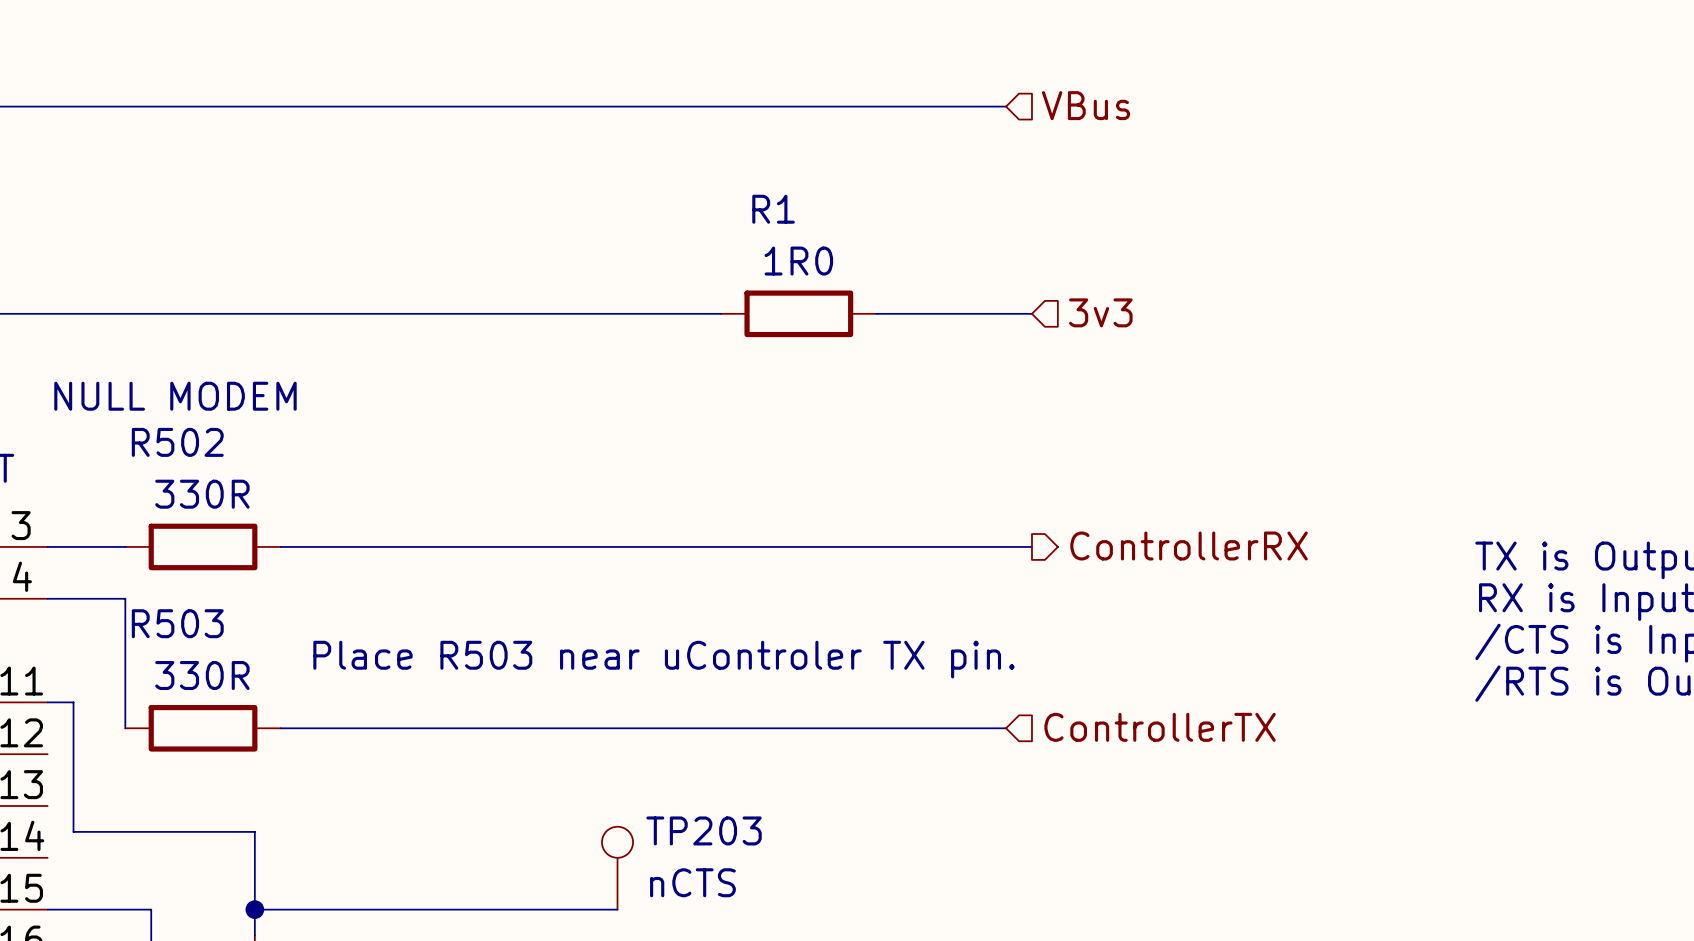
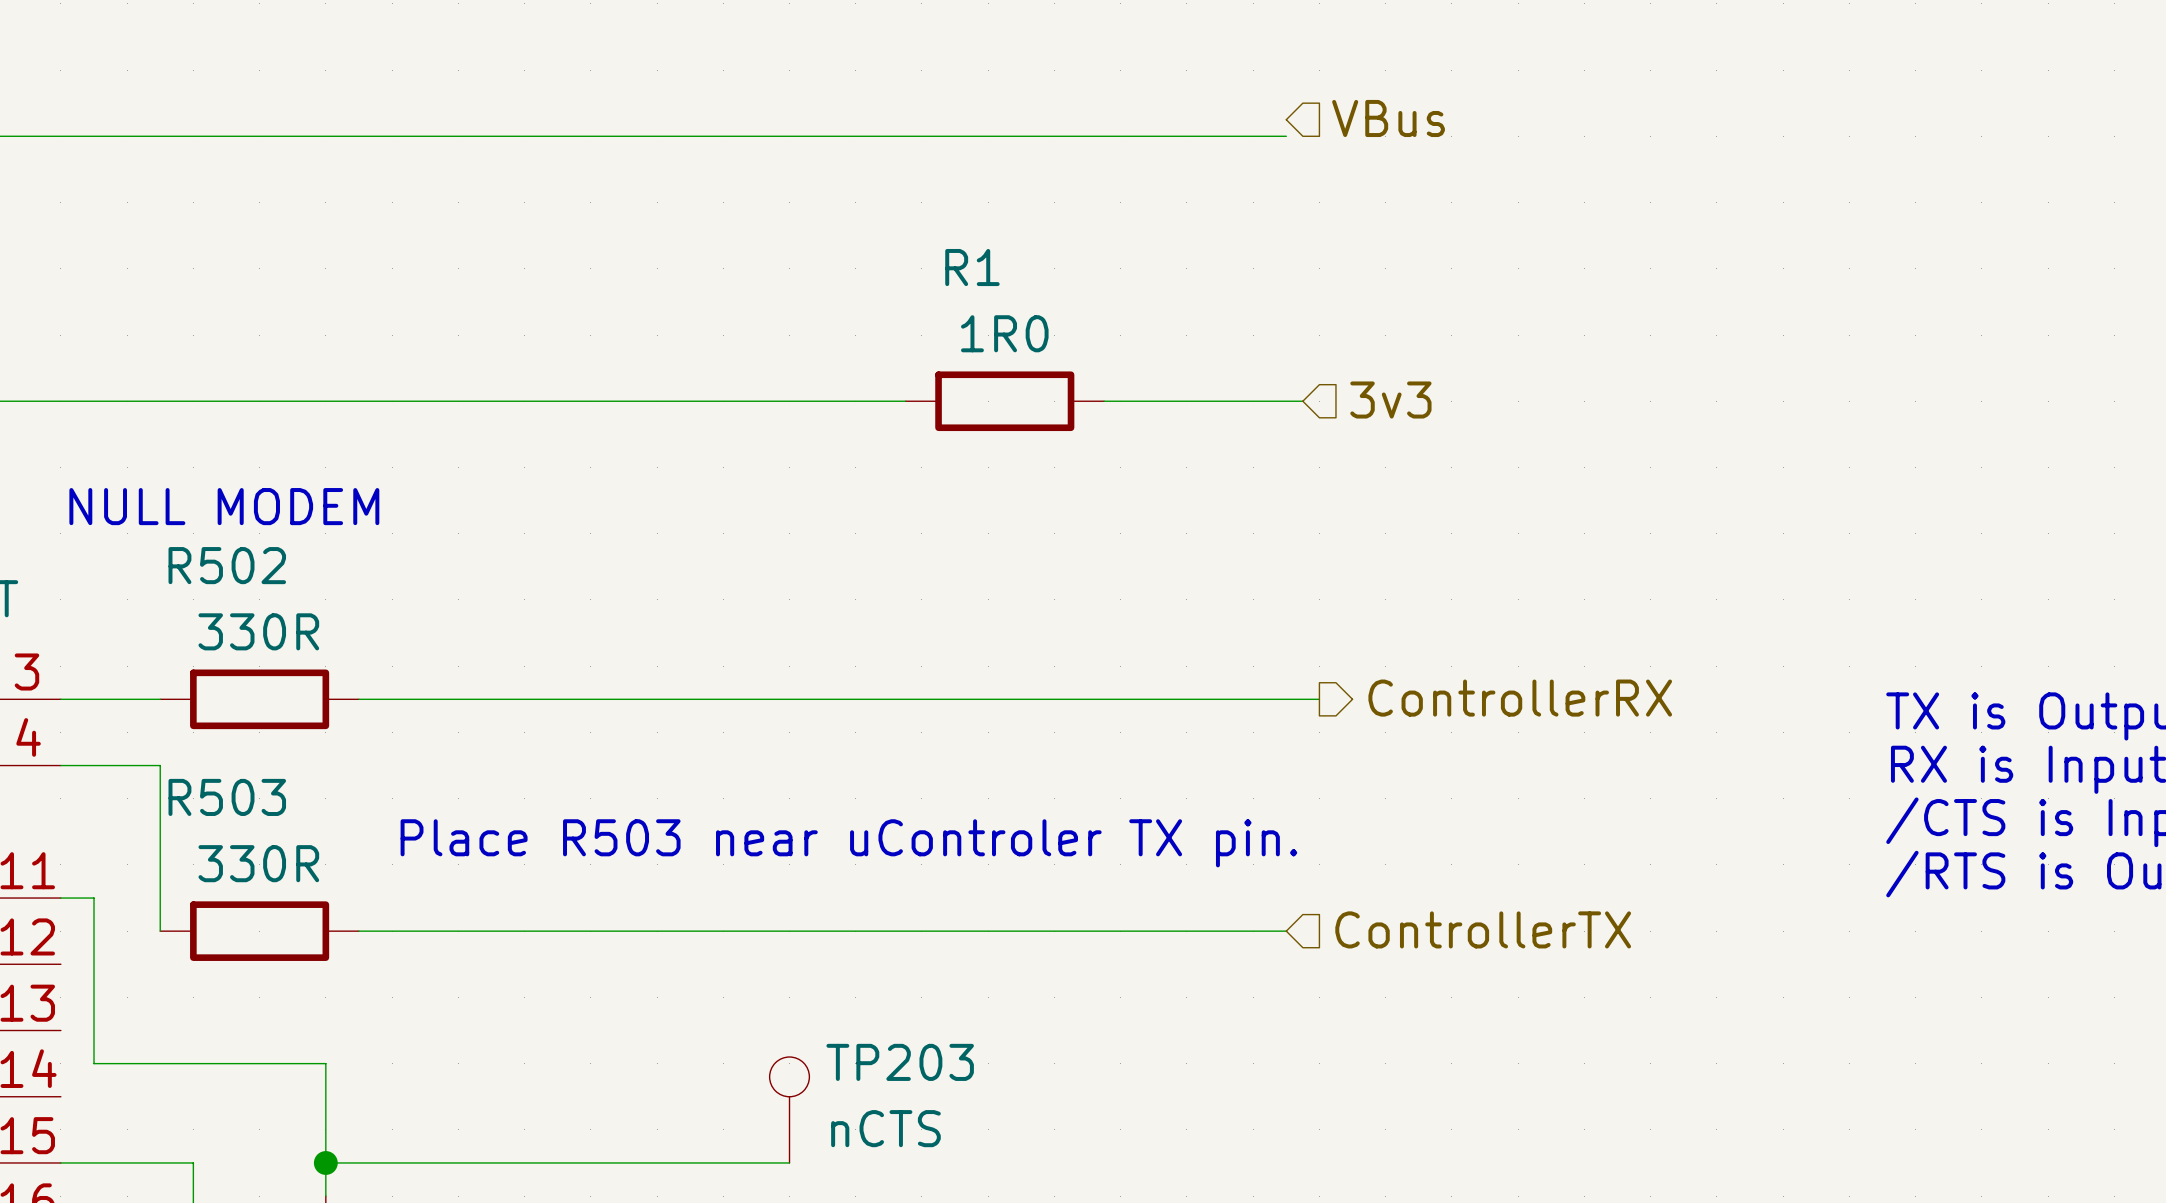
hierarchical label position: VBus (1086, 105) -> VBus (1388, 118)
hierarchical label position: 3v3 (1100, 312) -> 3v3 (1390, 400)
R1 position: (798, 313) -> (1004, 401)
wire: (1019, 313) (1031, 313) -> none

